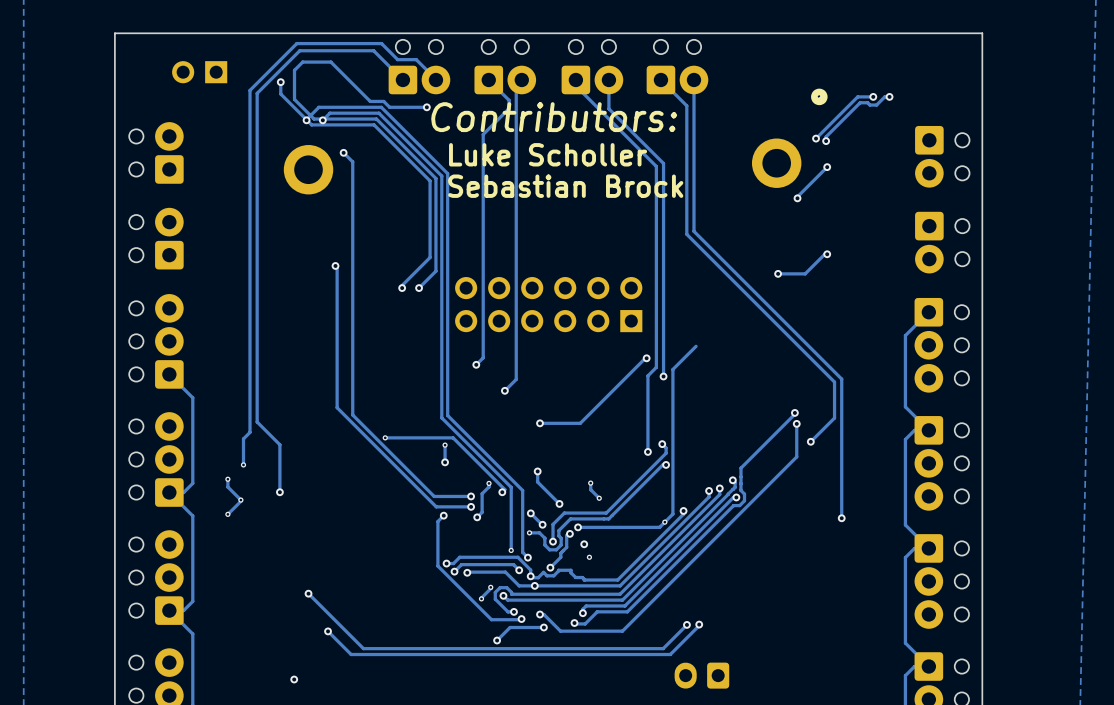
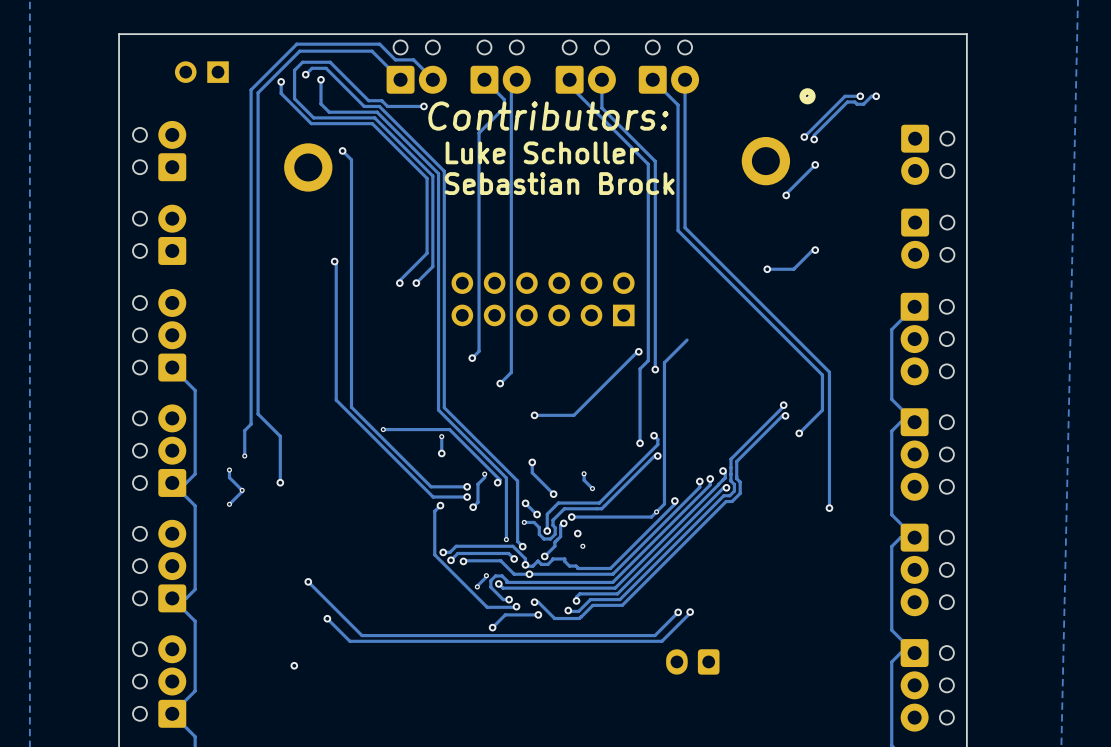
via: none -> (305, 74)
via: none -> (320, 79)
track: (365, 107) (318, 107) (306, 120) -> (364, 106) (326, 68) (312, 68) (305, 74)
track: (329, 113) (322, 120) -> (329, 112) (320, 103) (320, 79)
via: (306, 120) -> none
via: (322, 120) -> none
track: (796, 423) (796, 456) (750, 503) -> (785, 415) (782, 415) (736, 461) (736, 478) (740, 482) (740, 493)
track: (742, 511) (622, 631) (585, 631) -> (732, 501) (726, 501) (622, 605) (592, 605) (579, 618)

